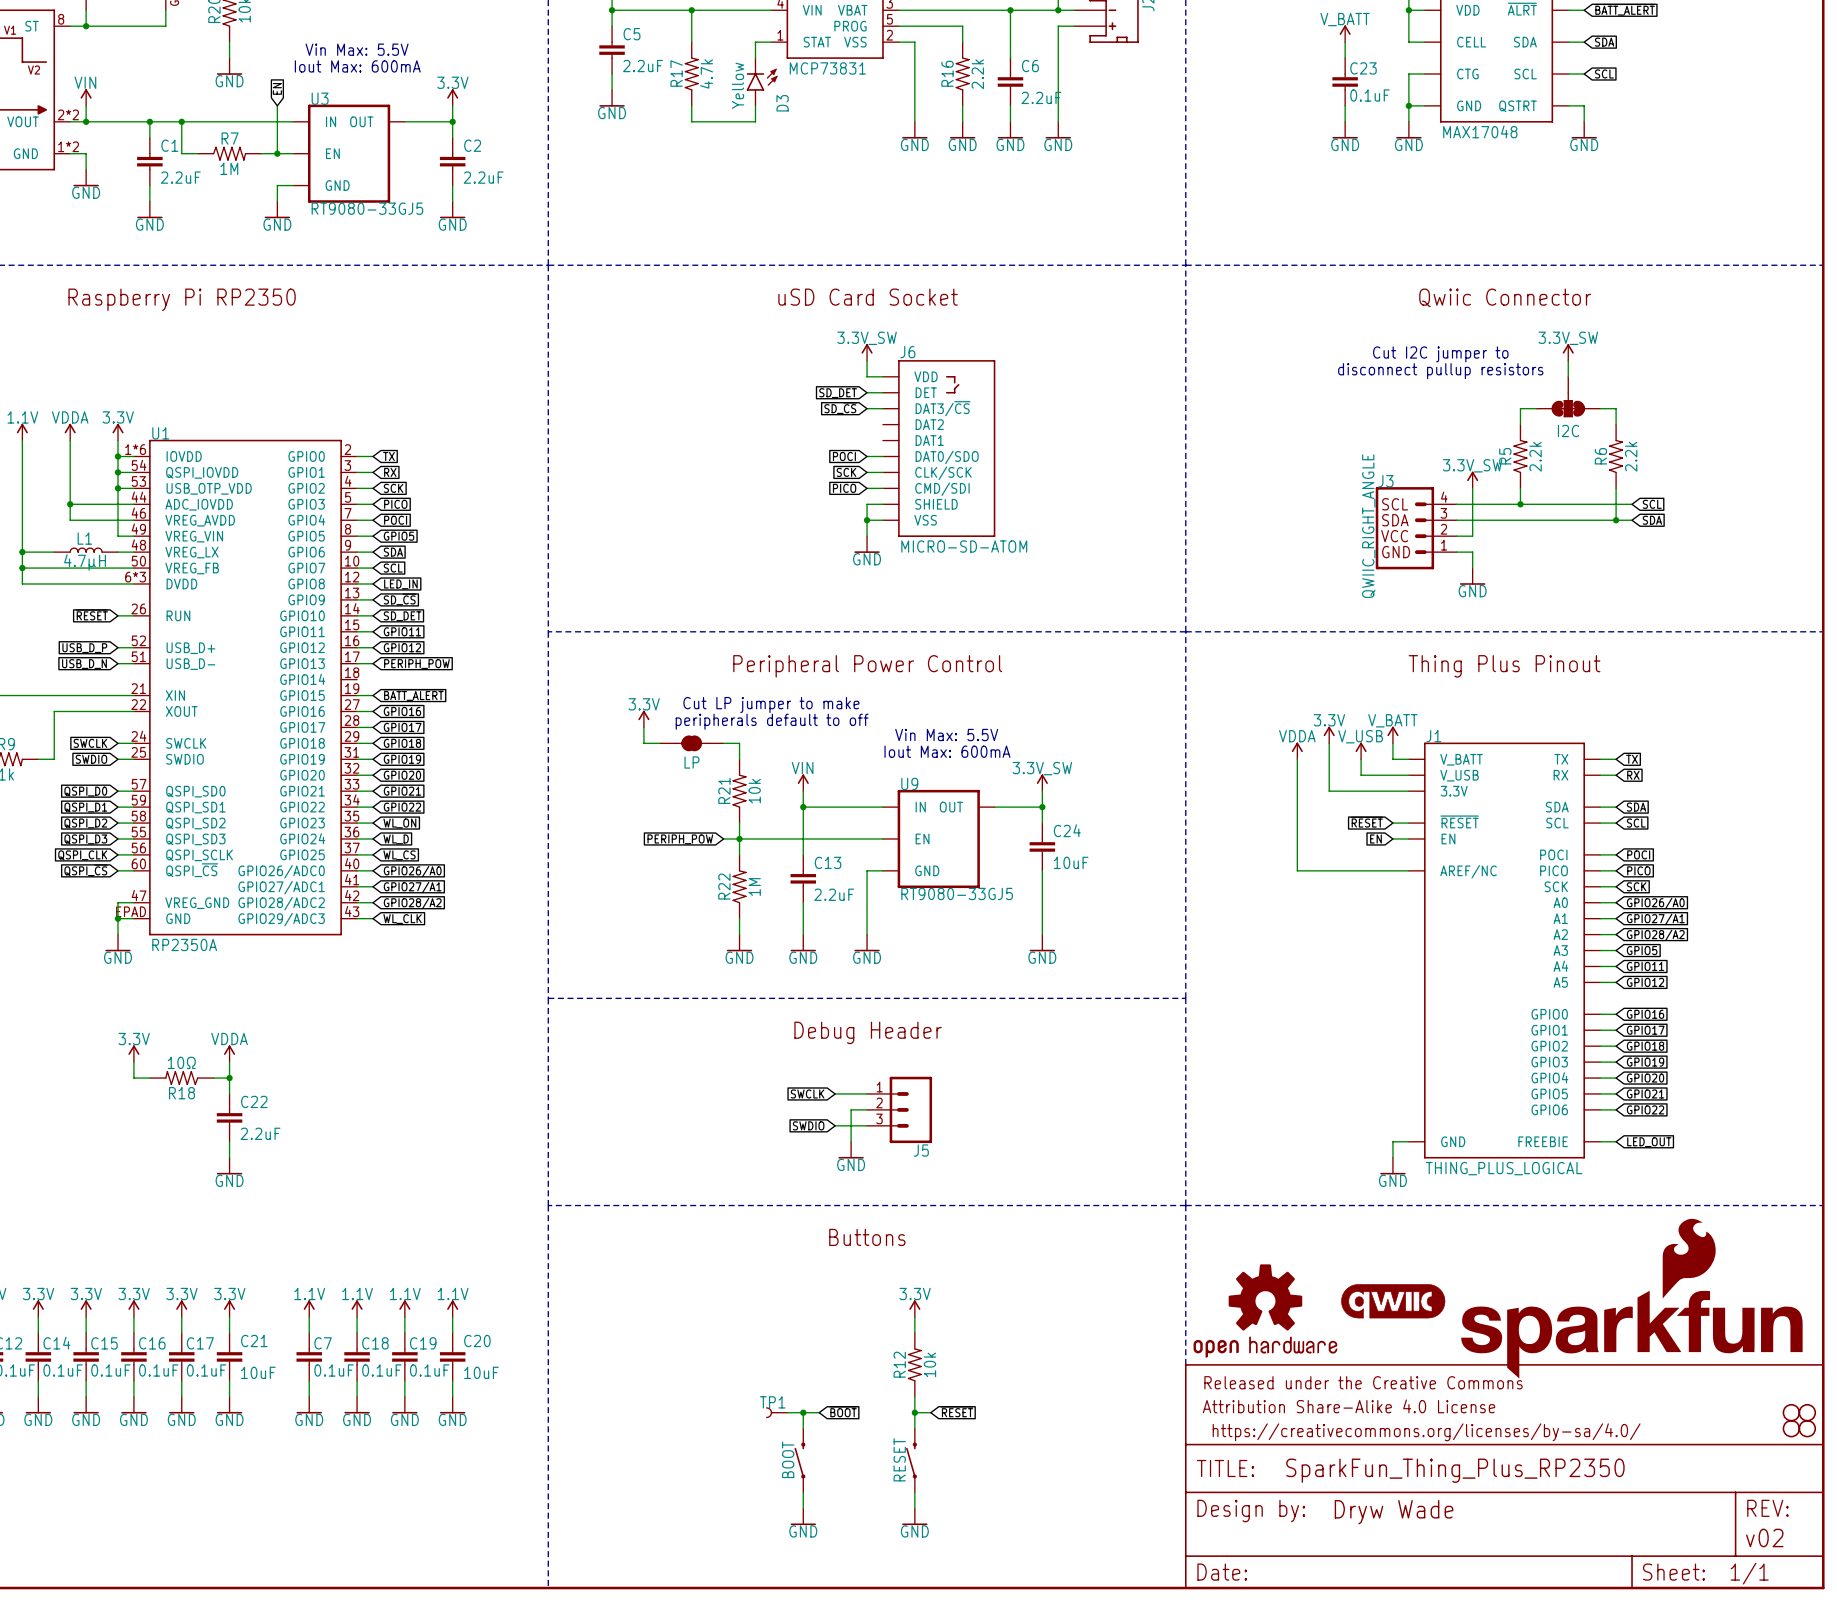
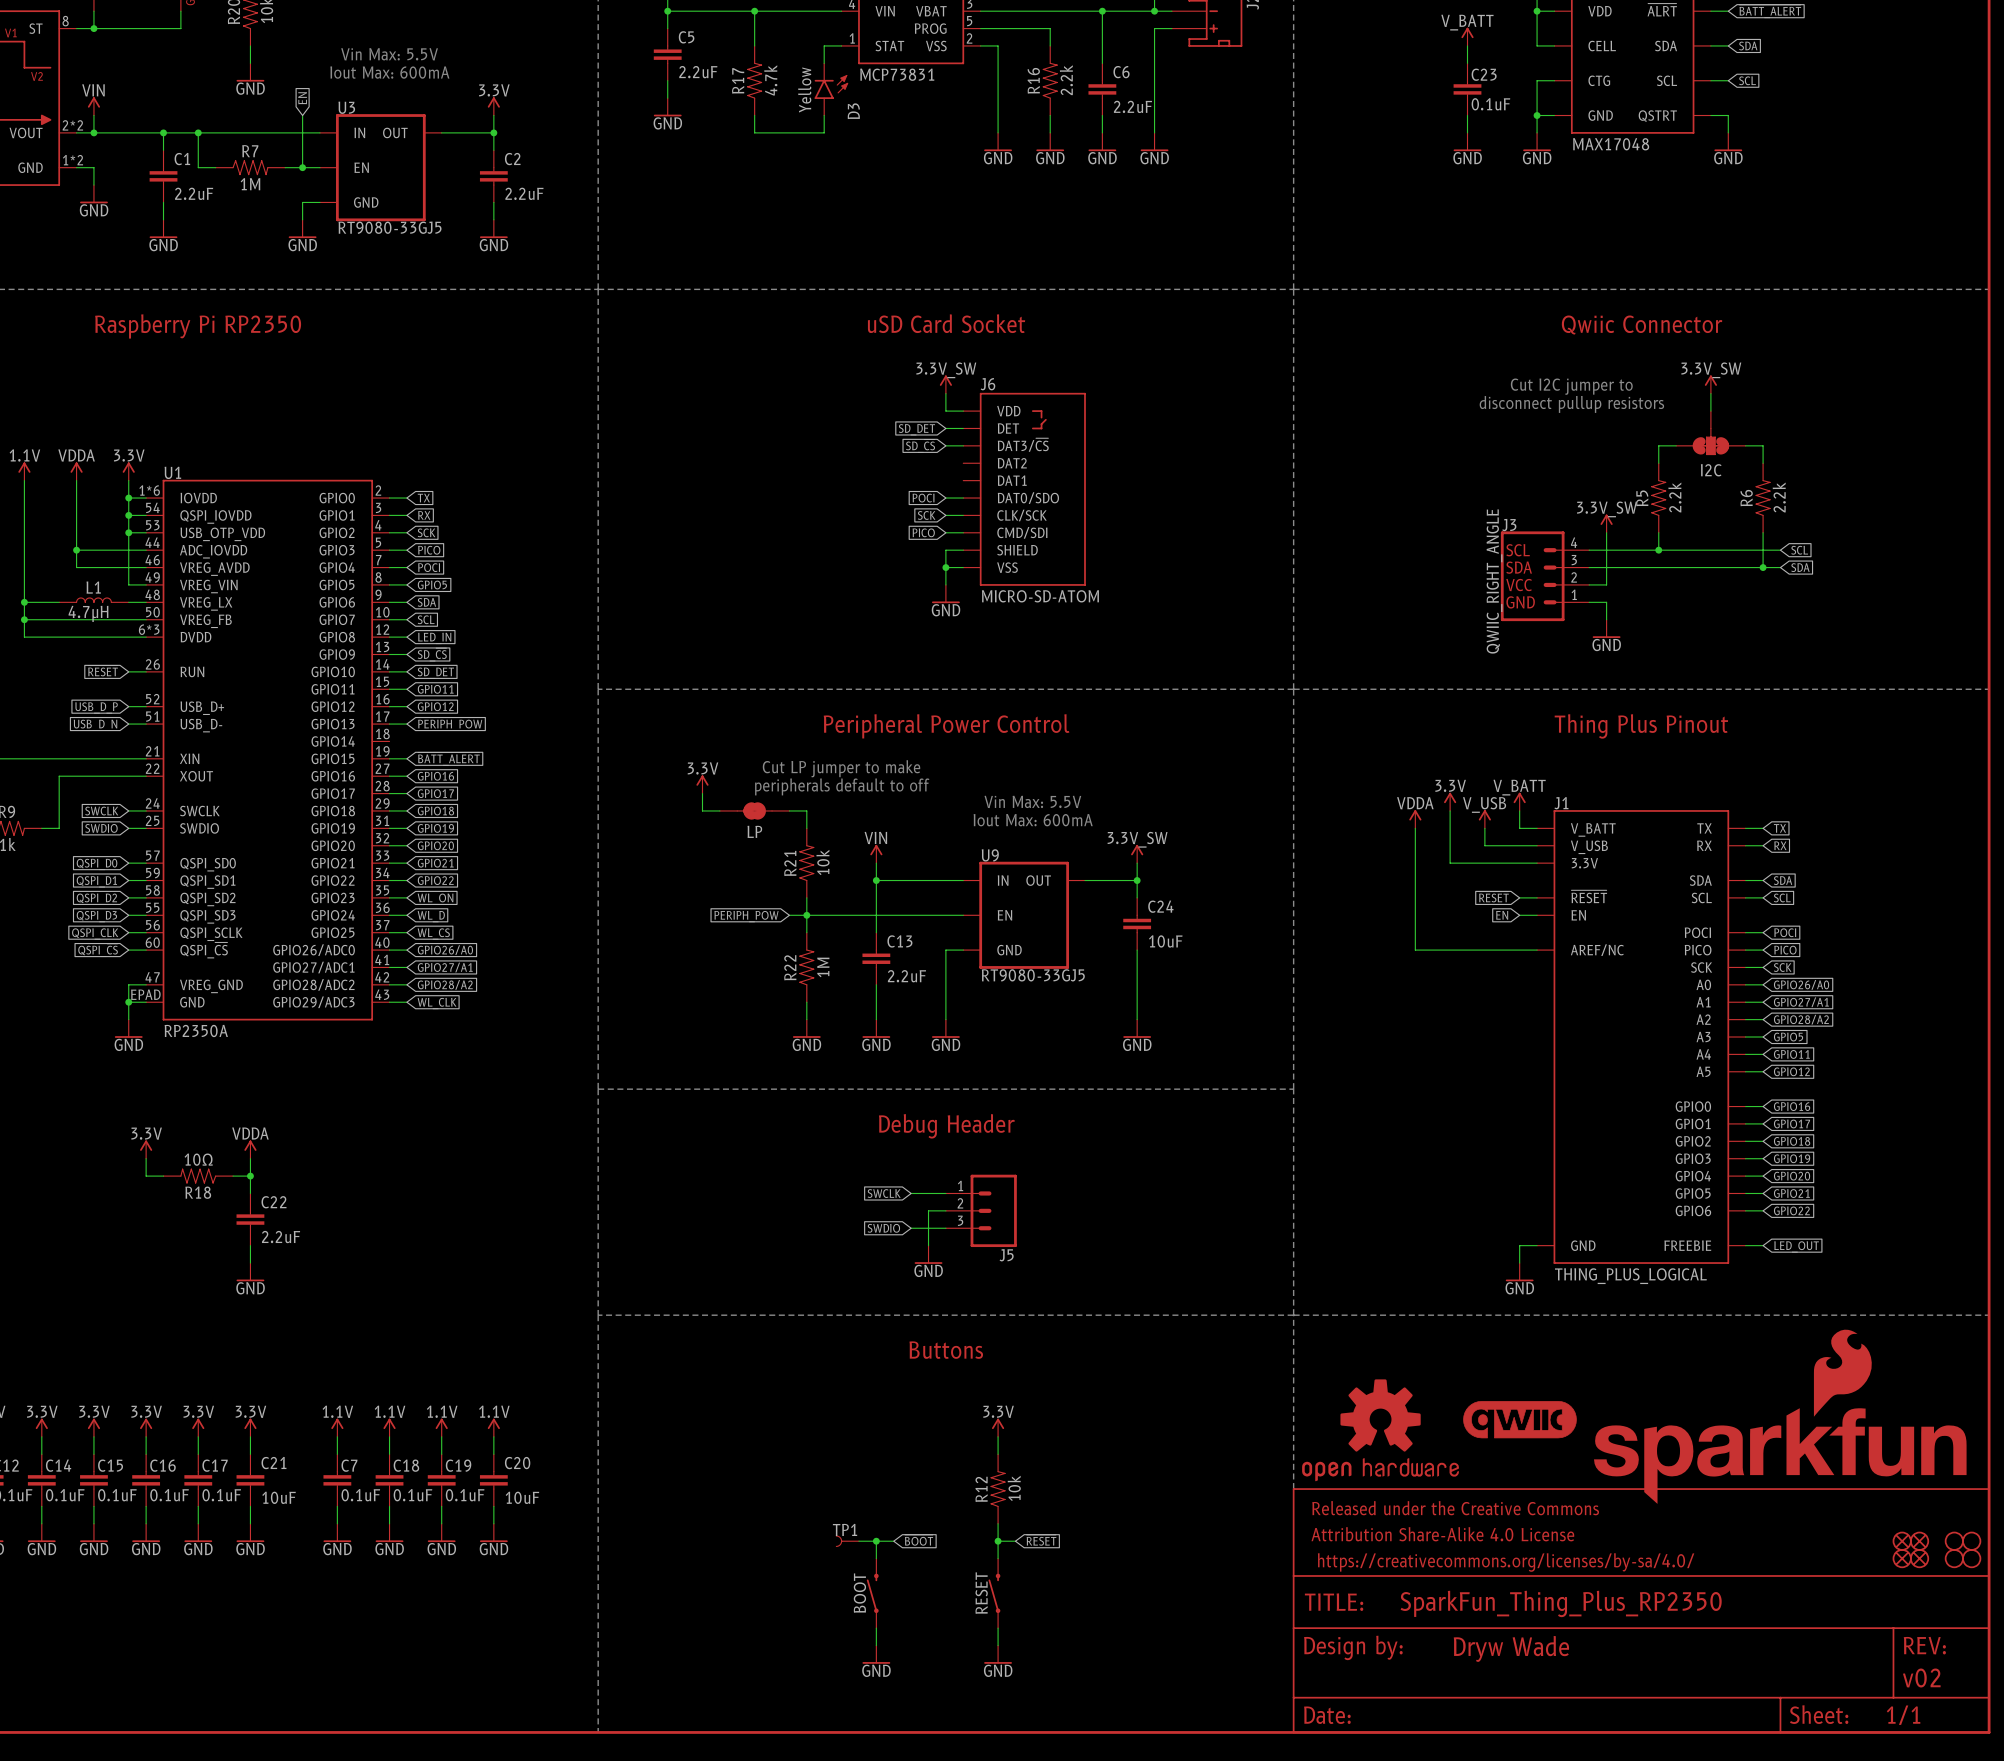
part: none -> (1902, 1541)
part: none -> (1919, 1541)
part: none -> (1902, 1558)
part: none -> (1919, 1558)

